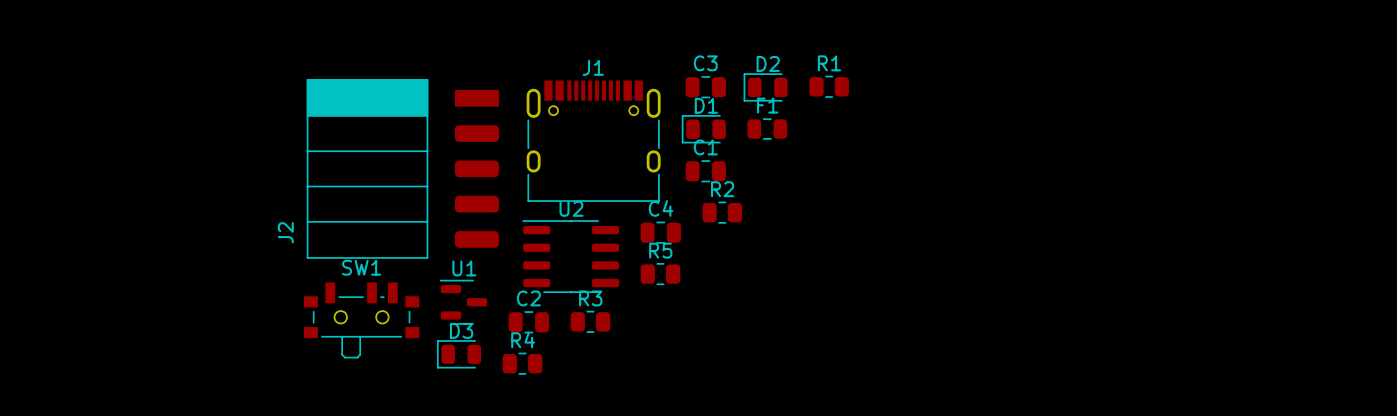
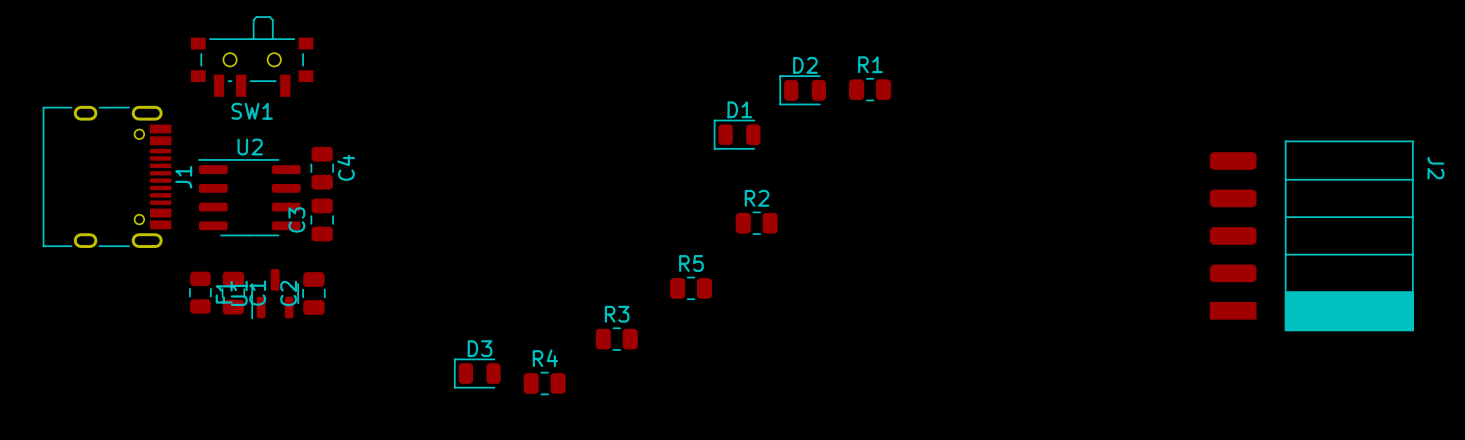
C3 name position: C3 (705, 63) -> C3 (296, 219)
C3 rotation: 0° (705, 87) -> 90° clockwise (322, 219)
C3 position: (705, 87) -> (322, 219)
F1 rotation: 0° (767, 129) -> 90° clockwise (200, 292)
F1 position: (767, 129) -> (200, 292)
J1 rotation: 0° (593, 141) -> 90° clockwise (107, 176)
J1 position: (593, 141) -> (107, 176)
J2 rotation: 0° (402, 168) -> 180° (1311, 235)
J2 position: (402, 168) -> (1311, 235)
C1 rotation: 0° (705, 171) -> 90° clockwise (233, 293)
C1 position: (705, 171) -> (233, 293)
C4 rotation: 0° (660, 232) -> 90° clockwise (322, 168)
C4 position: (660, 232) -> (322, 168)
U2 position: (570, 256) -> (249, 197)
C2 name position: C2 (528, 298) -> C2 (288, 293)
U1 rotation: 0° (463, 302) -> 90° counterclockwise (275, 294)
U1 position: (463, 302) -> (275, 294)
SW1 rotation: 0° (361, 320) -> 180° (252, 56)
SW1 position: (361, 320) -> (252, 56)
C2 rotation: 0° (528, 322) -> 90° clockwise (313, 293)
C2 position: (528, 322) -> (313, 293)

